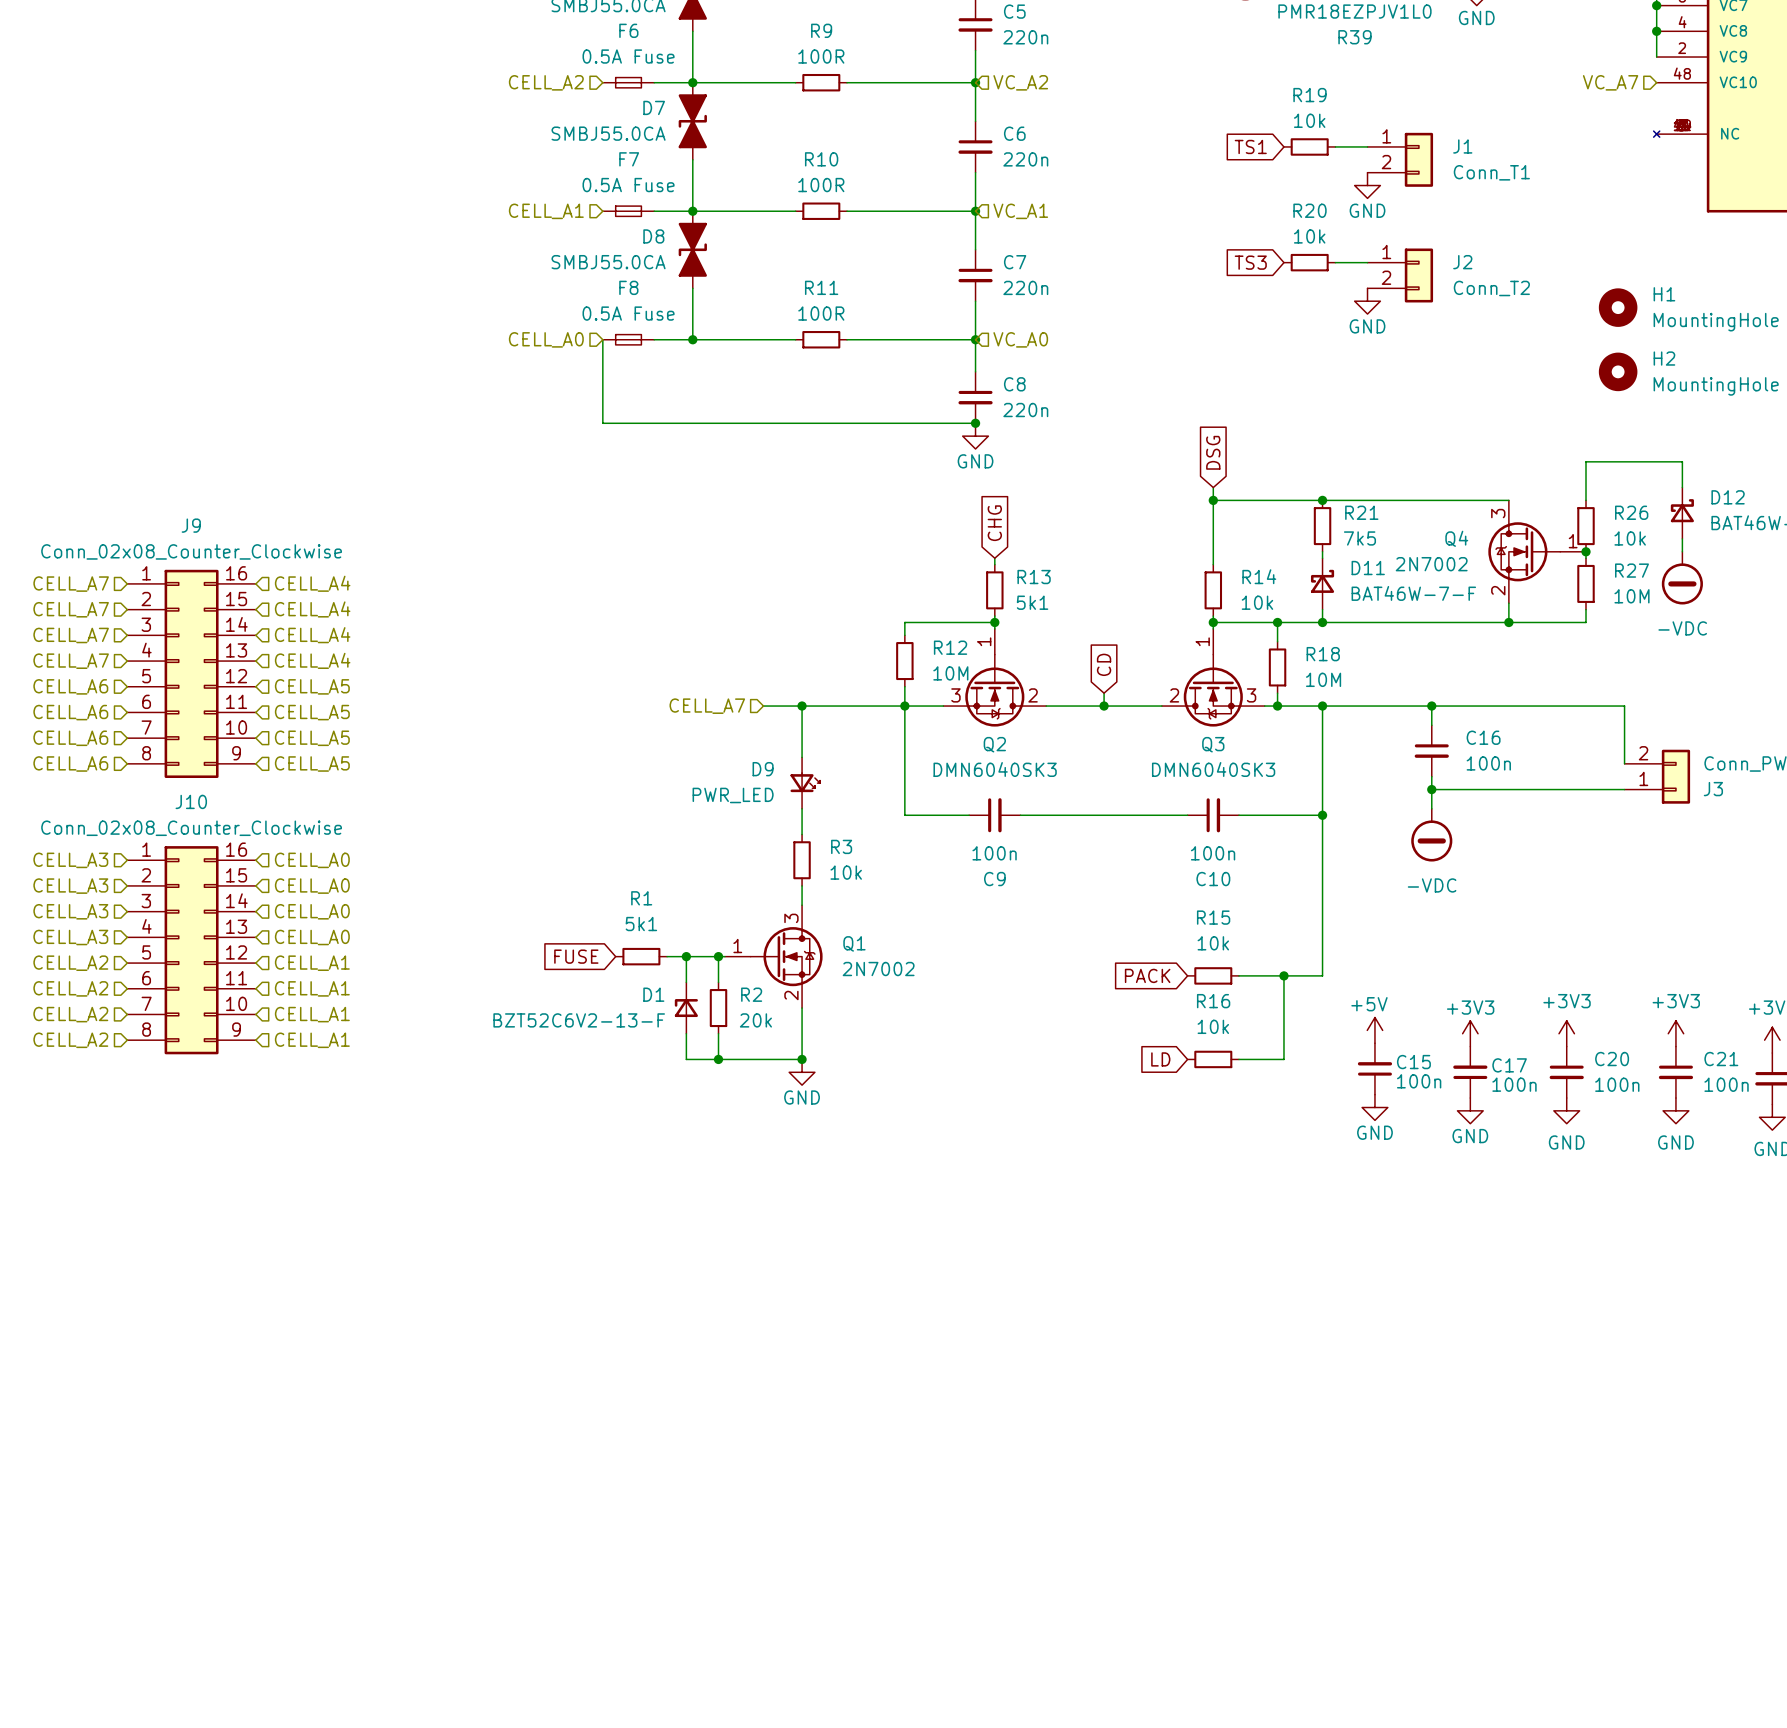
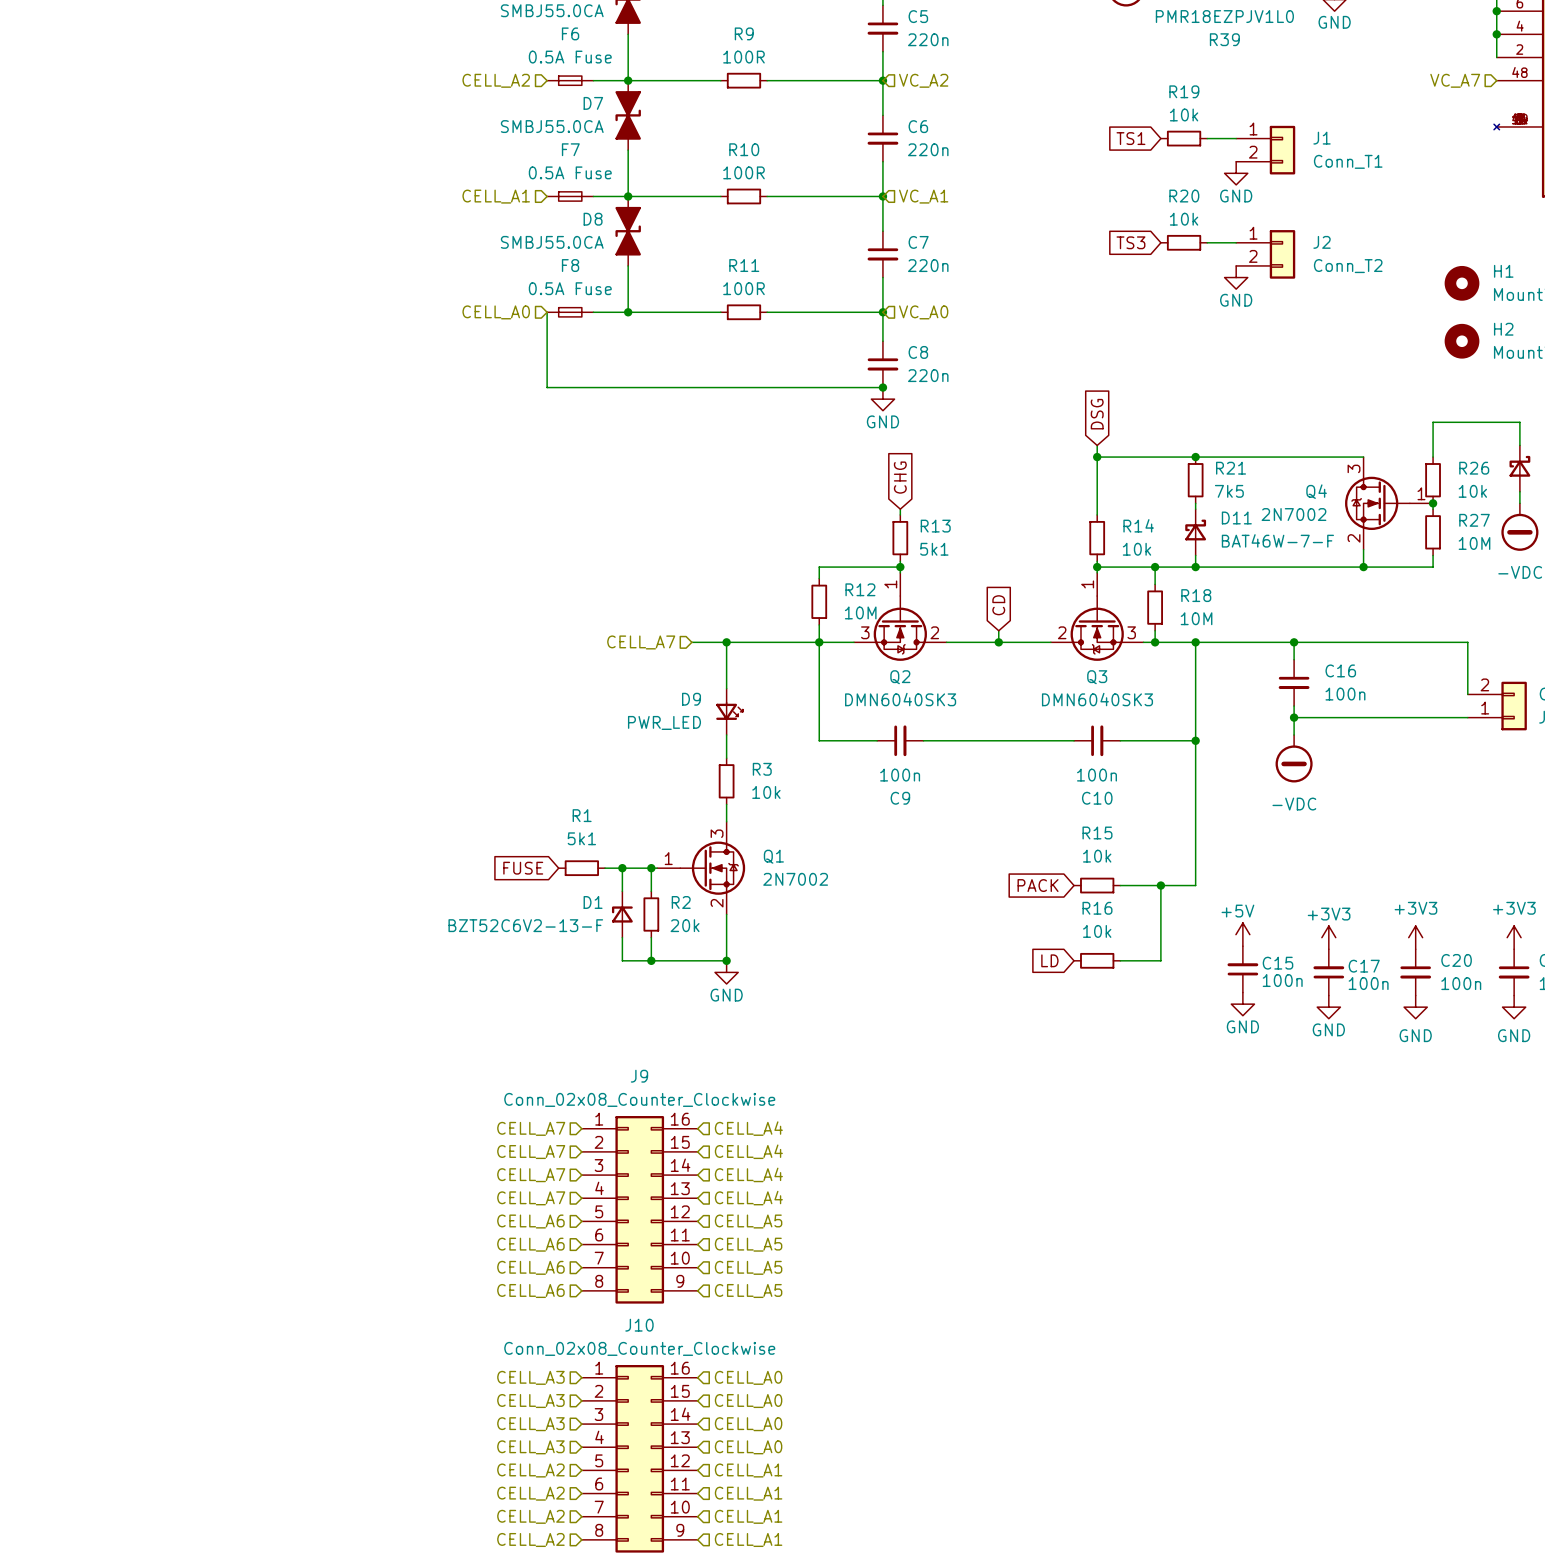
hierarchical label: CELL_A4 (312, 583) -> none
hierarchical label: CELL_A7 (71, 584) -> none
hierarchical label: CELL_A7 (71, 609) -> none
hierarchical label: CELL_A4 (312, 609) -> none
hierarchical label: CELL_A7 (71, 635) -> none
hierarchical label: CELL_A4 (312, 635) -> none
hierarchical label: CELL_A4 (312, 660) -> none
hierarchical label: CELL_A7 (71, 661) -> none
J9 position: (191, 673) -> (639, 1209)
hierarchical label: CELL_A6 (70, 686) -> none
hierarchical label: CELL_A5 (312, 686) -> none
hierarchical label: CELL_A6 (70, 712) -> none
hierarchical label: CELL_A5 (312, 712) -> none
hierarchical label: CELL_A6 (70, 738) -> none
hierarchical label: CELL_A5 (312, 738) -> none
hierarchical label: CELL_A6 (70, 763) -> none
hierarchical label: CELL_A5 (312, 763) -> none
hierarchical label: CELL_A3 (70, 860) -> none
hierarchical label: CELL_A0 (312, 860) -> none
hierarchical label: CELL_A3 (70, 886) -> none
hierarchical label: CELL_A0 (312, 886) -> none
hierarchical label: CELL_A3 (70, 911) -> none
hierarchical label: CELL_A0 (312, 911) -> none
hierarchical label: CELL_A3 (70, 937) -> none
hierarchical label: CELL_A0 (312, 937) -> none
J10 position: (191, 950) -> (639, 1458)
hierarchical label: CELL_A2 (70, 963) -> none
hierarchical label: CELL_A1 (312, 963) -> none
hierarchical label: CELL_A2 (70, 988) -> none
hierarchical label: CELL_A1 (312, 988) -> none
hierarchical label: CELL_A2 (70, 1014) -> none
hierarchical label: CELL_A1 (312, 1014) -> none
hierarchical label: CELL_A2 (70, 1040) -> none
hierarchical label: CELL_A1 (312, 1040) -> none
hierarchical label: none -> CELL_A7 (531, 1128)
hierarchical label: none -> CELL_A4 (748, 1128)
hierarchical label: none -> CELL_A7 (531, 1152)
hierarchical label: none -> CELL_A4 (748, 1151)
hierarchical label: none -> CELL_A7 (531, 1175)
hierarchical label: none -> CELL_A4 (748, 1174)
hierarchical label: none -> CELL_A4 (748, 1198)
hierarchical label: none -> CELL_A7 (531, 1198)
hierarchical label: none -> CELL_A6 (530, 1221)
hierarchical label: none -> CELL_A5 (748, 1221)
hierarchical label: none -> CELL_A6 (530, 1244)
hierarchical label: none -> CELL_A5 (748, 1244)
hierarchical label: none -> CELL_A6 (530, 1267)
hierarchical label: none -> CELL_A5 (748, 1267)
hierarchical label: none -> CELL_A6 (530, 1291)
hierarchical label: none -> CELL_A5 (748, 1291)
hierarchical label: none -> CELL_A3 (530, 1377)
hierarchical label: none -> CELL_A0 (748, 1377)
hierarchical label: none -> CELL_A3 (530, 1401)
hierarchical label: none -> CELL_A0 (748, 1401)
hierarchical label: none -> CELL_A3 (530, 1424)
hierarchical label: none -> CELL_A0 (748, 1424)
hierarchical label: none -> CELL_A3 (530, 1447)
hierarchical label: none -> CELL_A0 (748, 1447)
hierarchical label: none -> CELL_A2 (530, 1470)
hierarchical label: none -> CELL_A1 (748, 1470)
hierarchical label: none -> CELL_A2 (530, 1493)
hierarchical label: none -> CELL_A1 (748, 1493)
hierarchical label: none -> CELL_A2 (530, 1516)
hierarchical label: none -> CELL_A1 (748, 1516)
hierarchical label: none -> CELL_A2 (530, 1539)
hierarchical label: none -> CELL_A1 (748, 1539)

